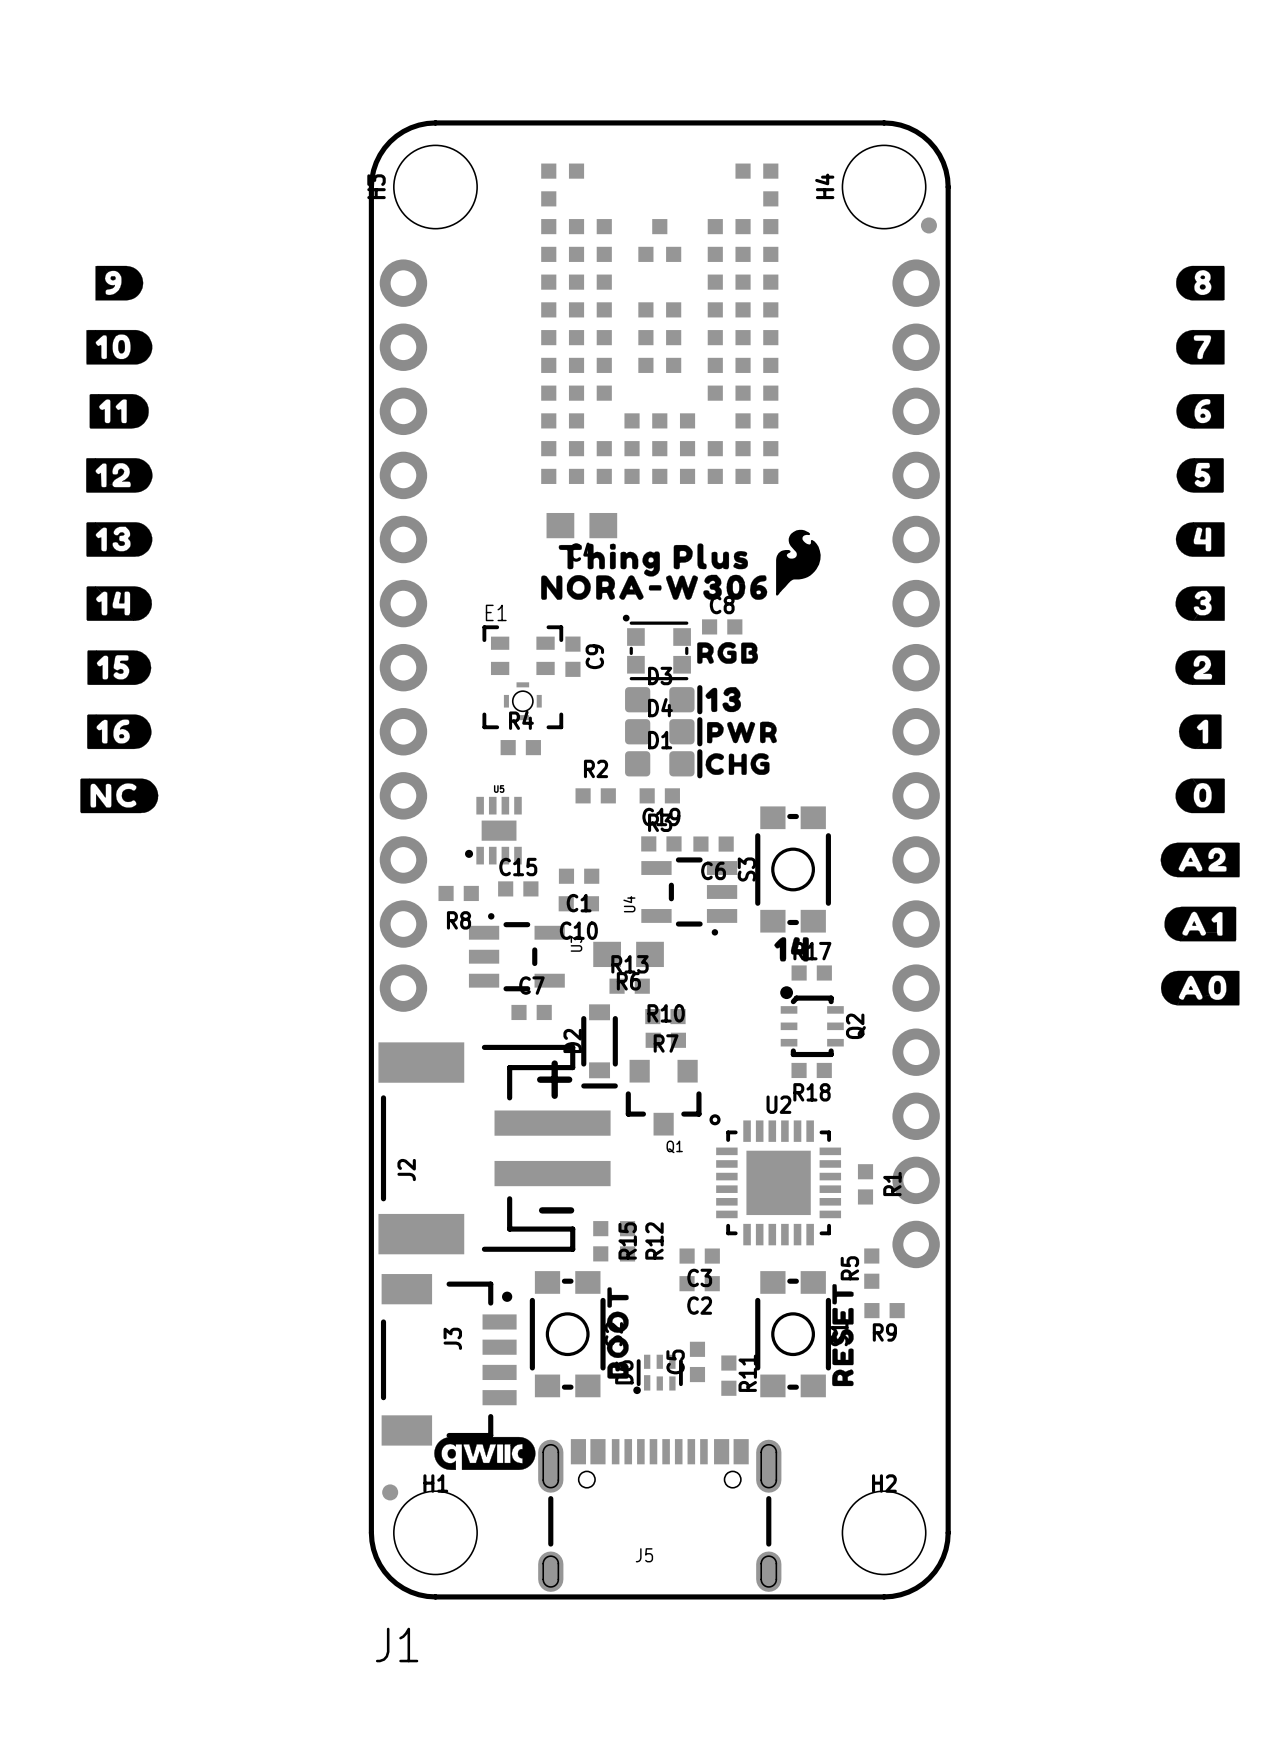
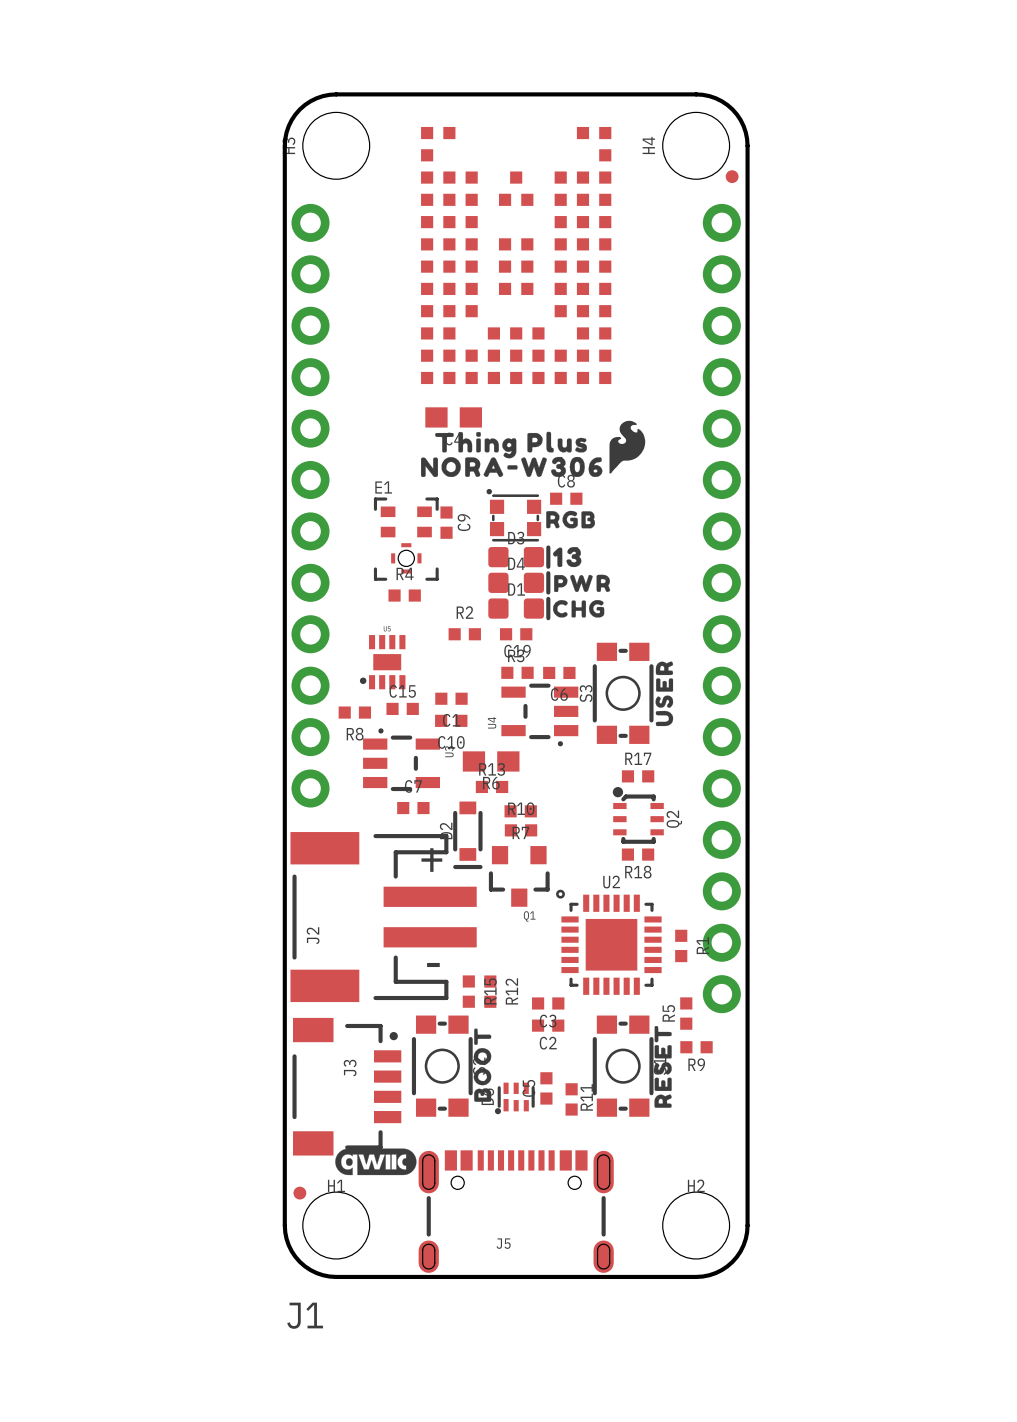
drawing: [80, 265, 159, 814] -> none
drawing: [1160, 265, 1240, 1006] -> none
drawing: none -> [655, 661, 674, 727]
drawing: [774, 937, 809, 962] -> none

